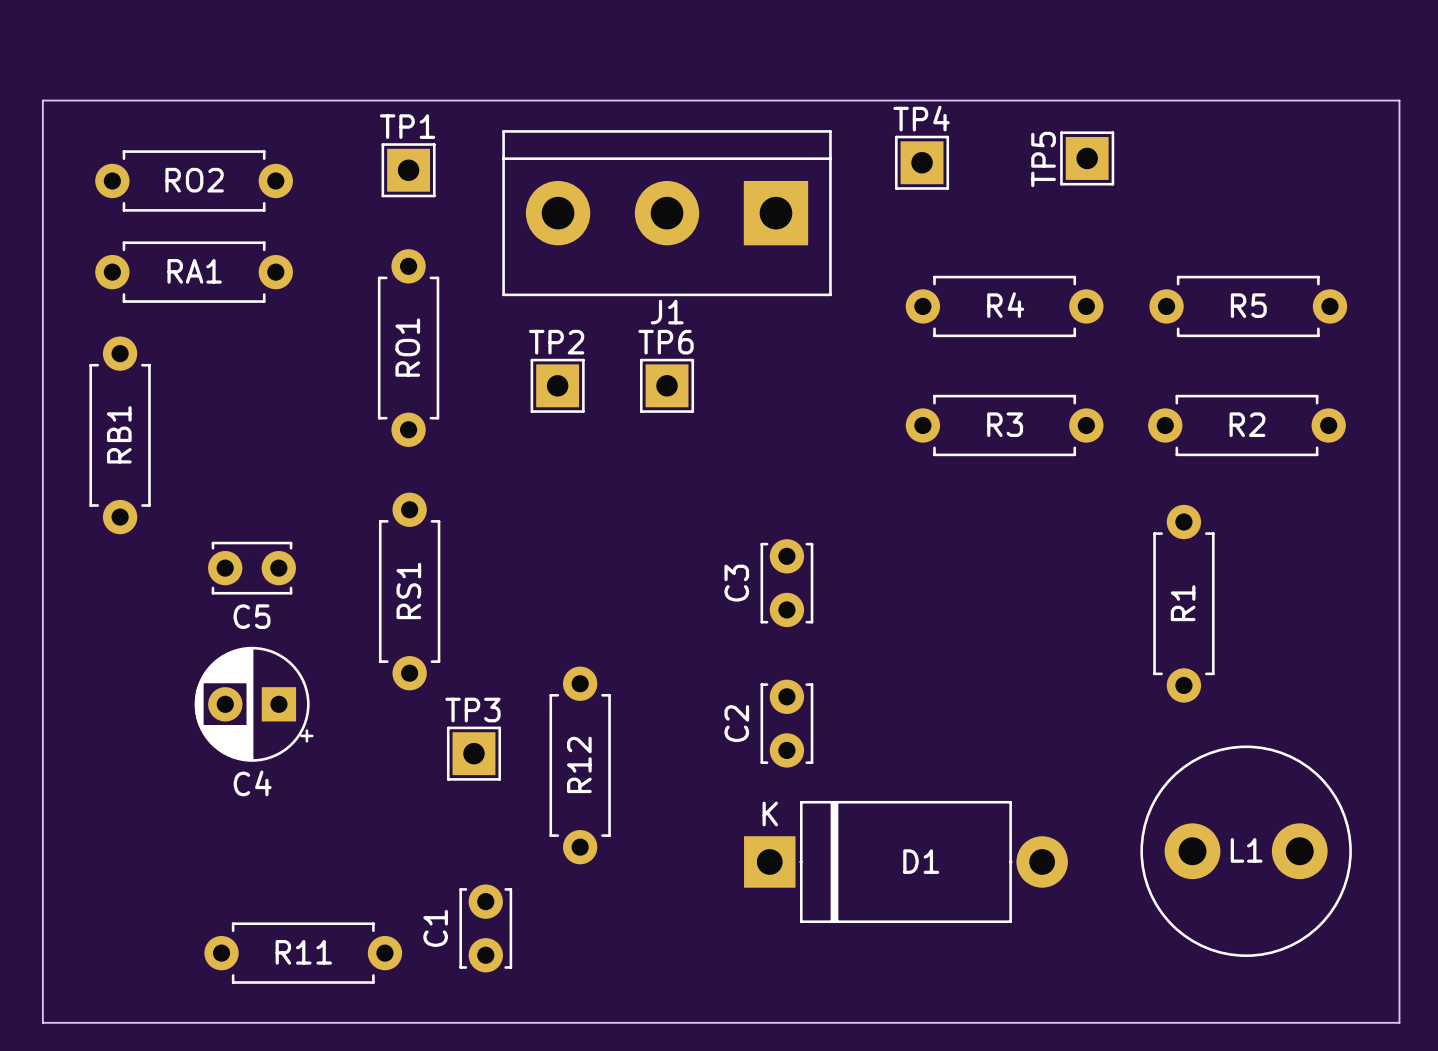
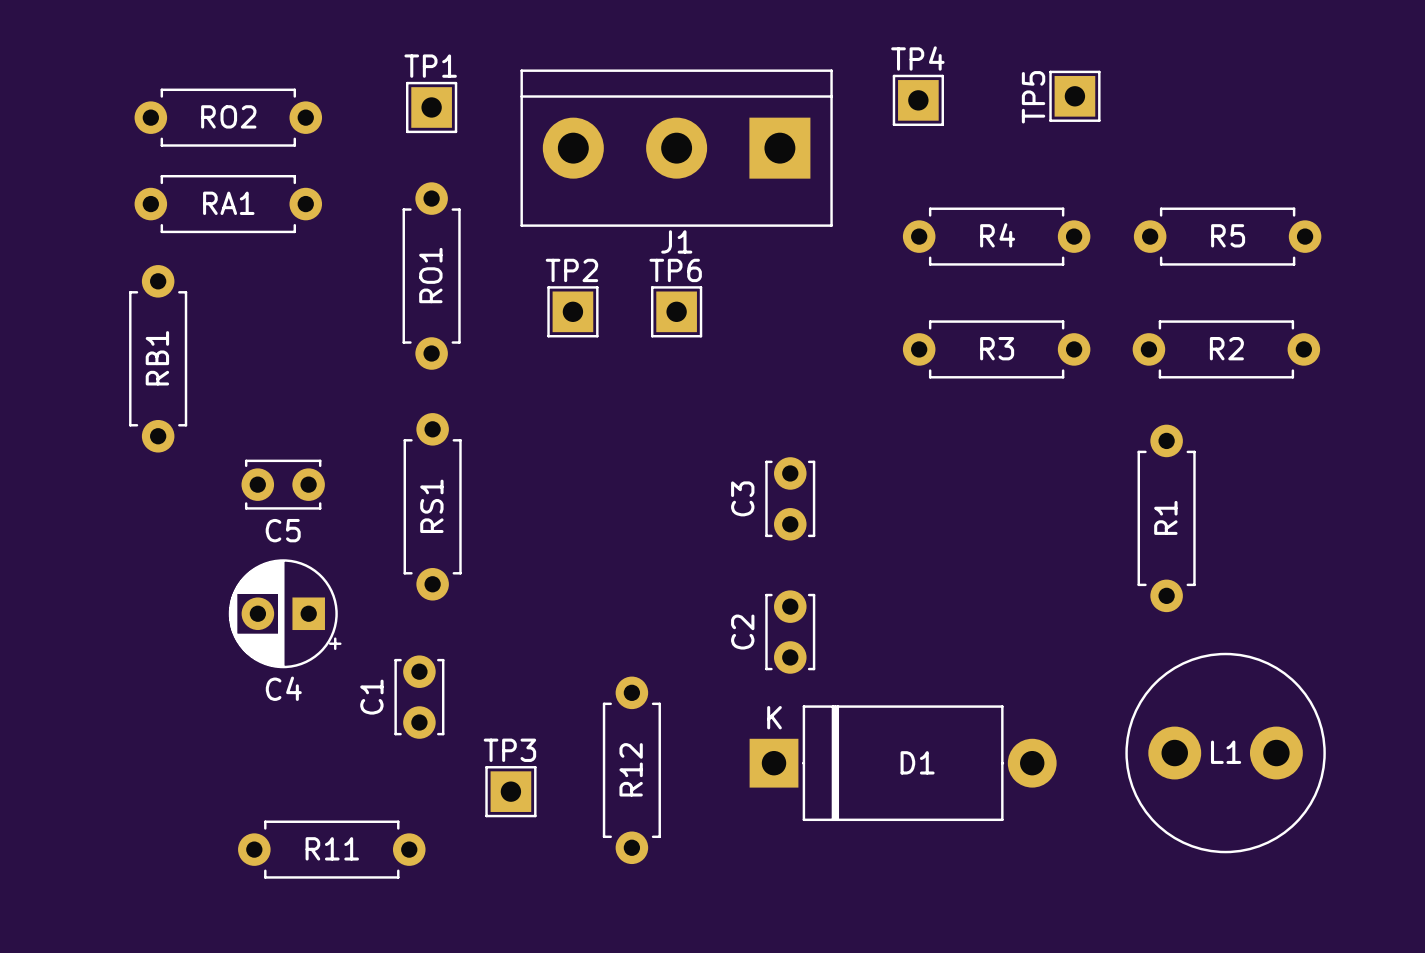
board edge: (42, 100) (1399, 100) (1399, 1022) (42, 1022) (42, 100) -> none
TP3 position: (473, 753) -> (510, 791)
R12 position: (580, 765) -> (631, 770)
C1 position: (485, 928) -> (419, 697)

